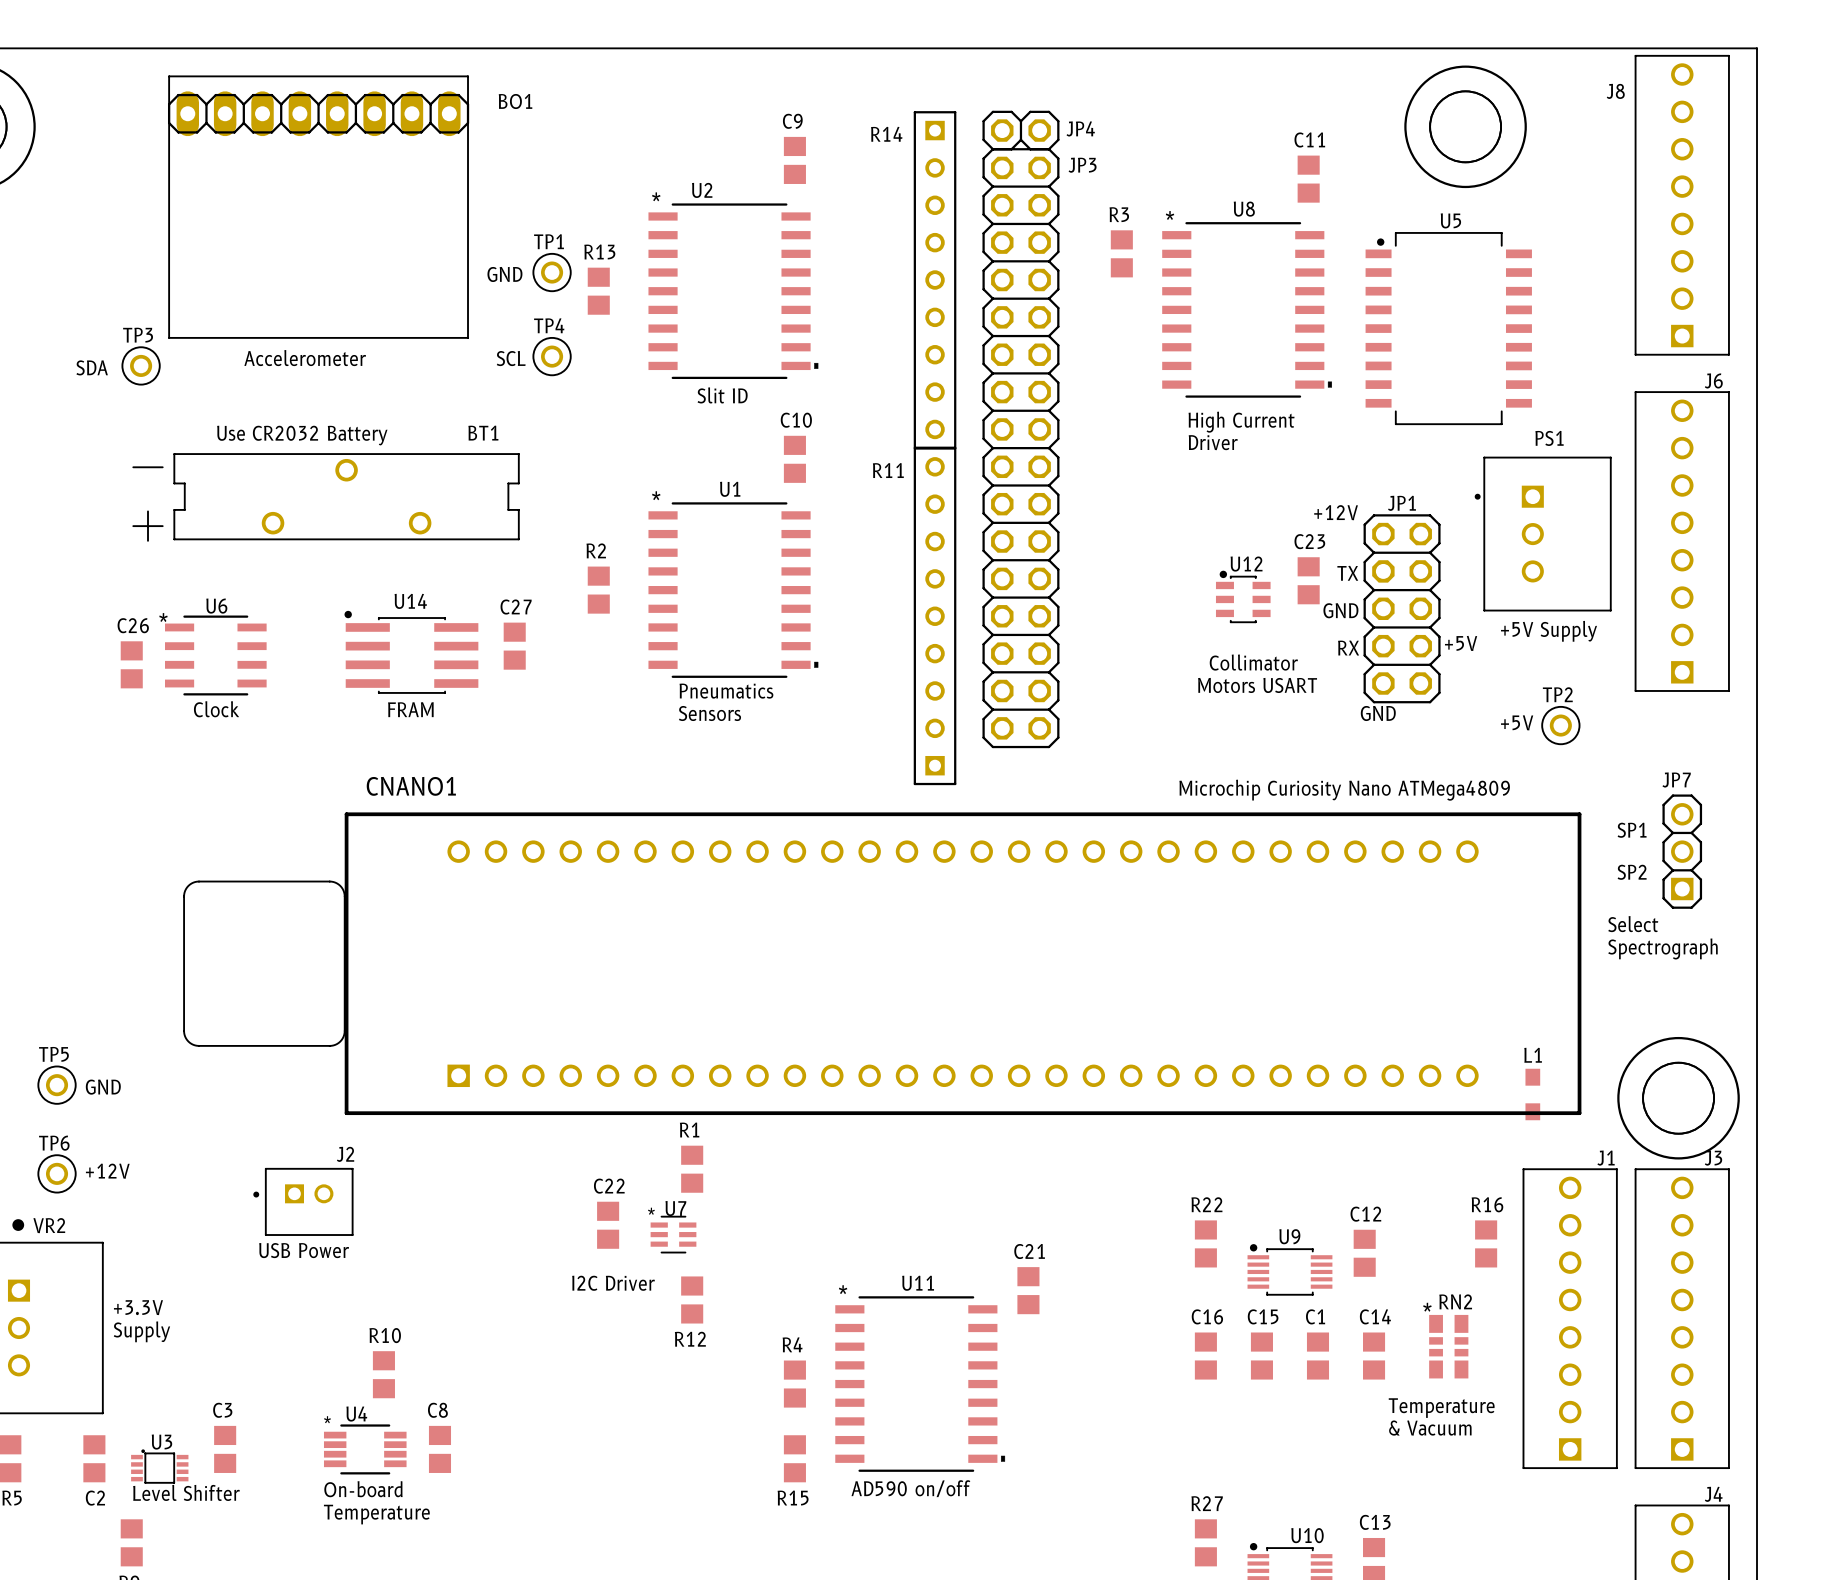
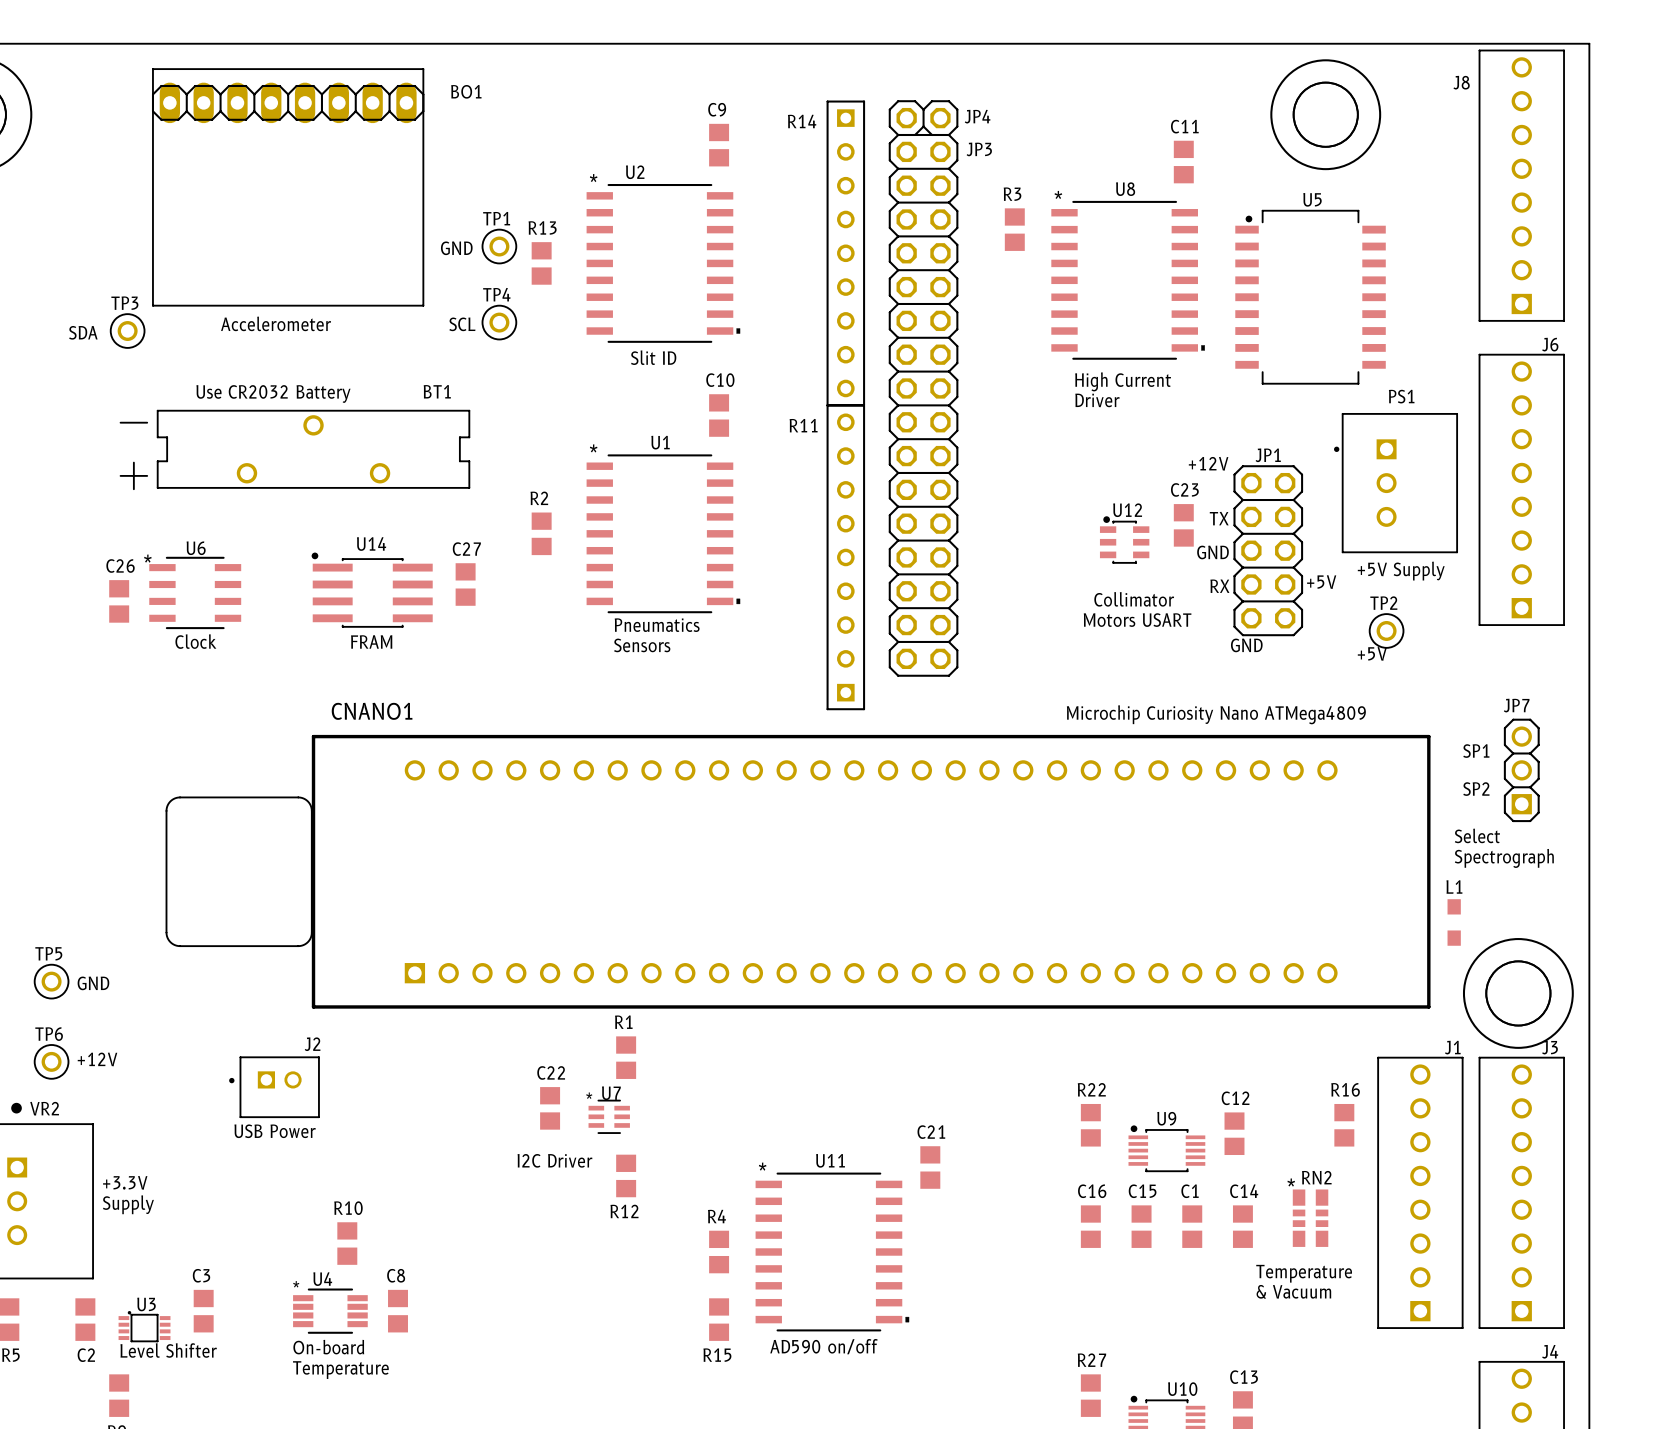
TP2 position: (1560, 725) -> (1386, 630)
L1 position: (1532, 1094) -> (1454, 922)

